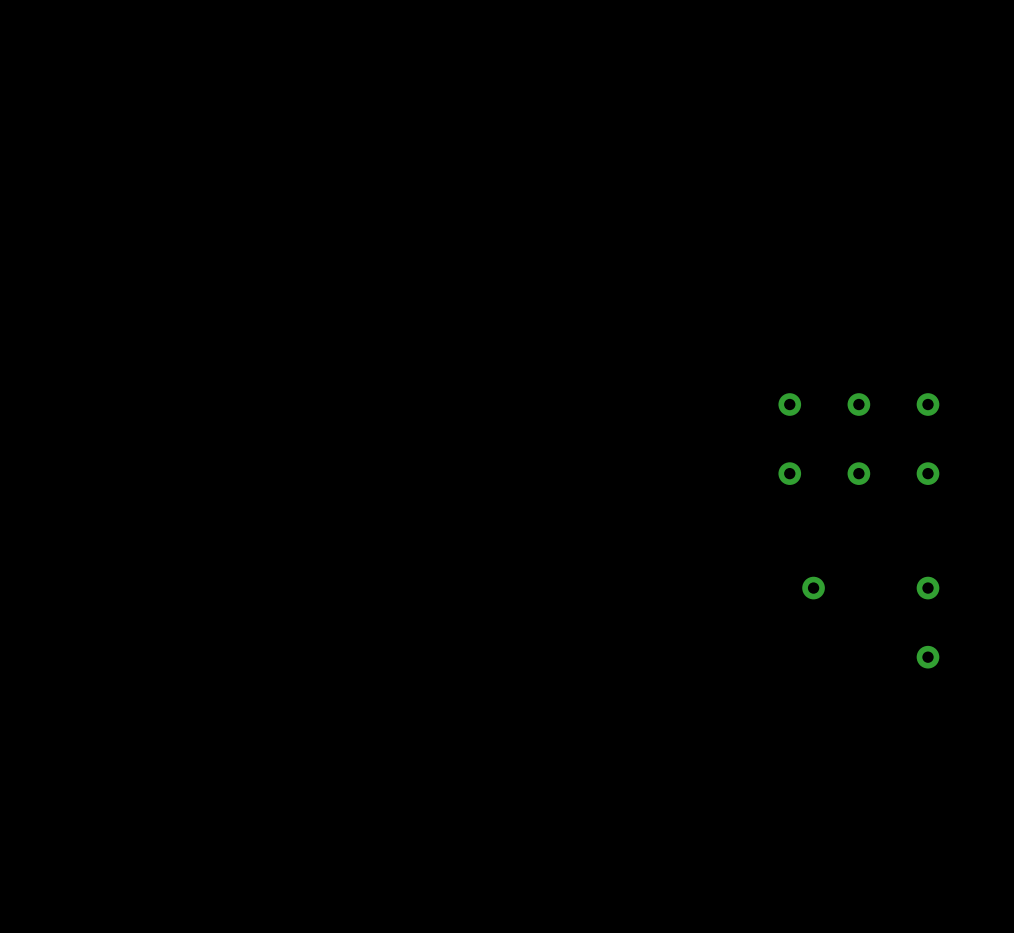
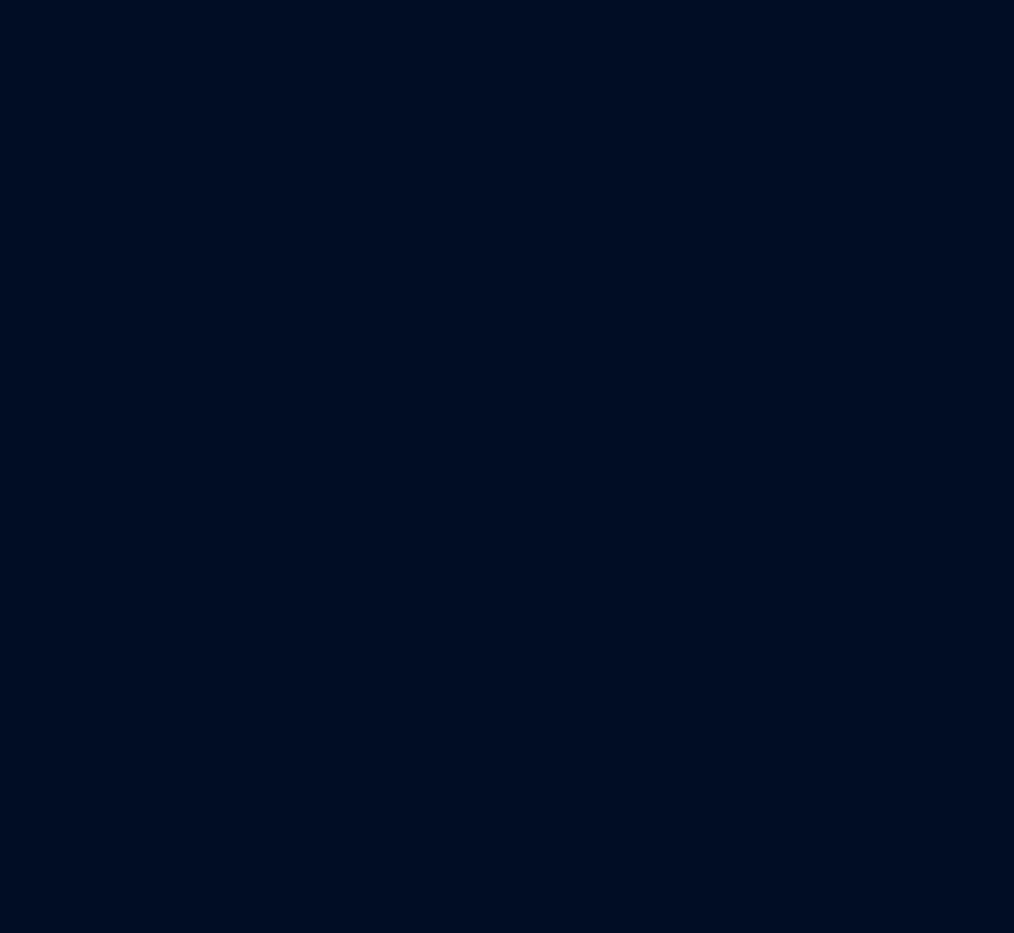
part: (789, 404) -> none
part: (858, 404) -> none
part: (927, 404) -> none
part: (789, 473) -> none
part: (858, 473) -> none
part: (927, 473) -> none
part: (813, 588) -> none
part: (927, 588) -> none
part: (927, 657) -> none

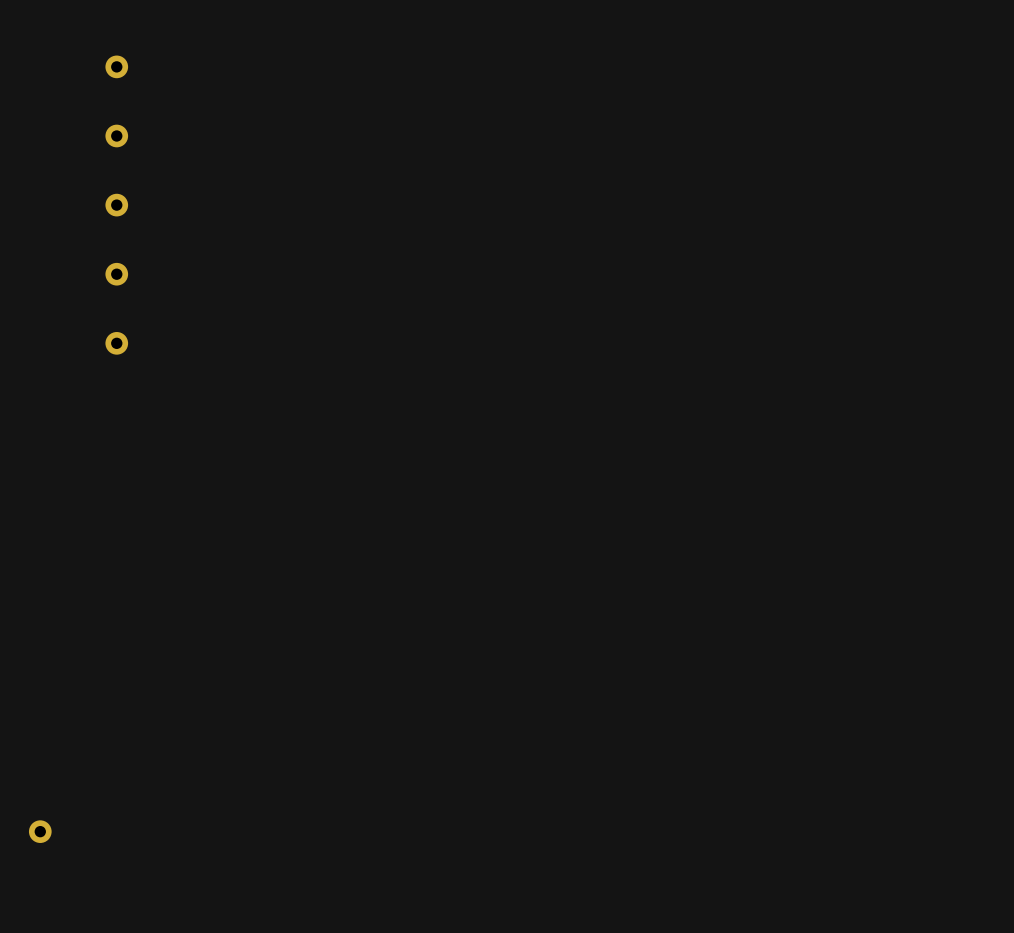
part: none -> (116, 66)
part: none -> (116, 135)
part: none -> (116, 205)
part: none -> (116, 274)
part: none -> (116, 343)
part: none -> (40, 831)

